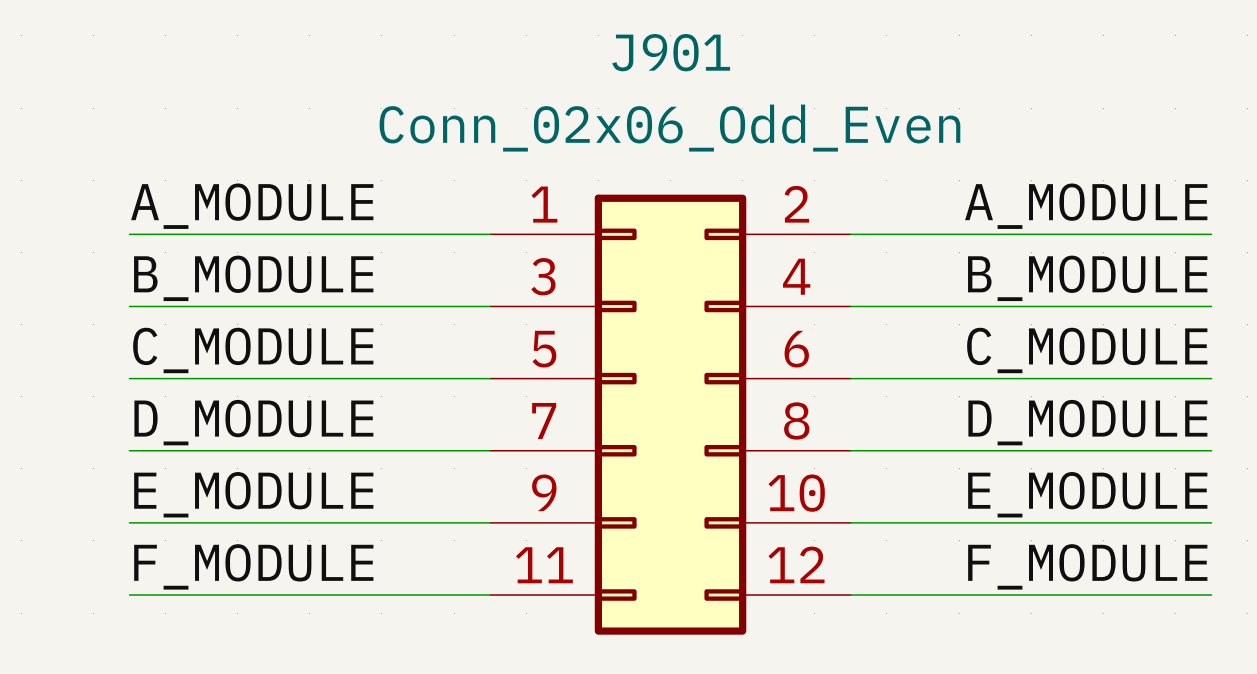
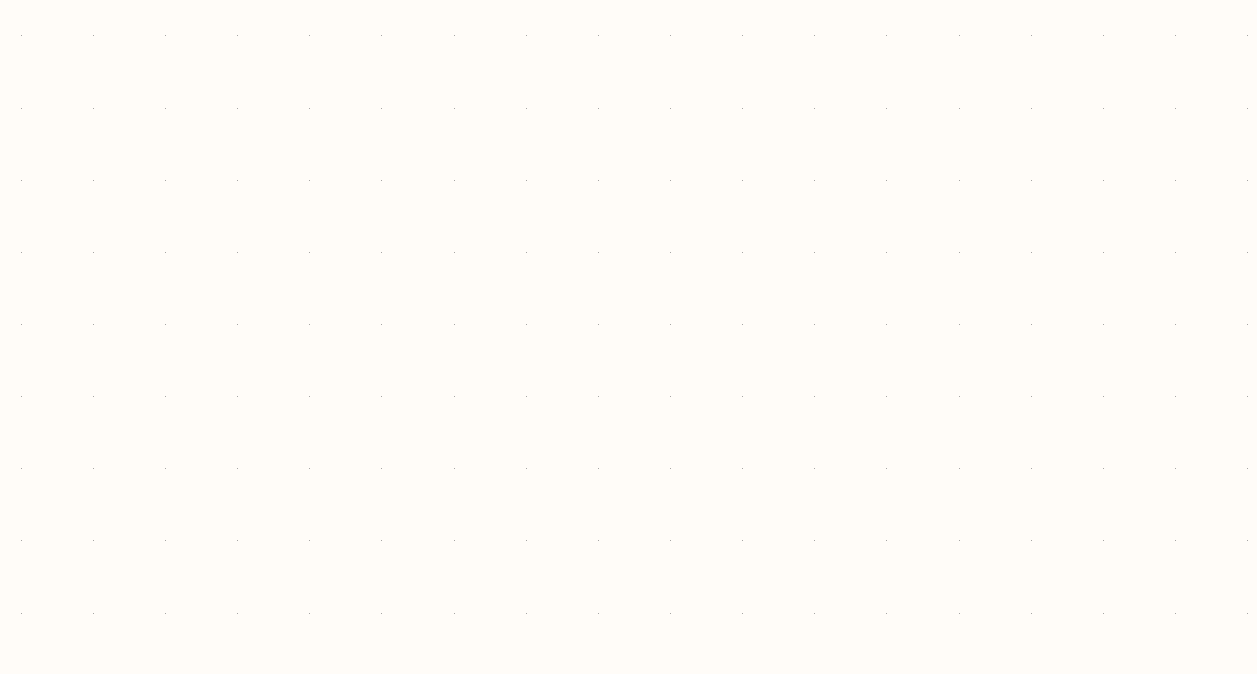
label: A_MODULE (252, 206) -> none
label: A_MODULE (1086, 206) -> none
wire: (129, 234) (490, 234) -> none
wire: (850, 234) (1211, 234) -> none
label: B_MODULE (253, 278) -> none
label: B_MODULE (1087, 278) -> none
wire: (129, 306) (490, 306) -> none
wire: (850, 306) (1211, 306) -> none
label: C_MODULE (253, 350) -> none
label: C_MODULE (1087, 350) -> none
wire: (129, 378) (490, 378) -> none
wire: (850, 378) (1211, 378) -> none
J901: Conn_02x06_Odd_Even (670, 414) -> none
label: D_MODULE (253, 422) -> none
label: D_MODULE (1087, 422) -> none
wire: (129, 450) (490, 450) -> none
wire: (850, 450) (1211, 450) -> none
label: E_MODULE (253, 494) -> none
label: E_MODULE (1087, 494) -> none
wire: (129, 522) (490, 522) -> none
wire: (850, 522) (1211, 522) -> none
label: F_MODULE (253, 566) -> none
label: F_MODULE (1087, 566) -> none
wire: (129, 595) (490, 595) -> none
wire: (850, 595) (1211, 595) -> none

